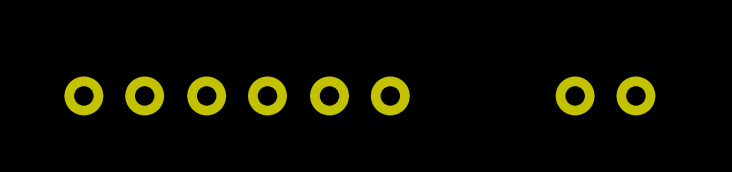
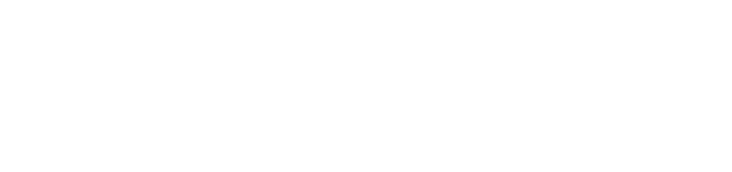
part: (114, 95) -> none
part: (237, 95) -> none
part: (359, 95) -> none
part: (605, 95) -> none

